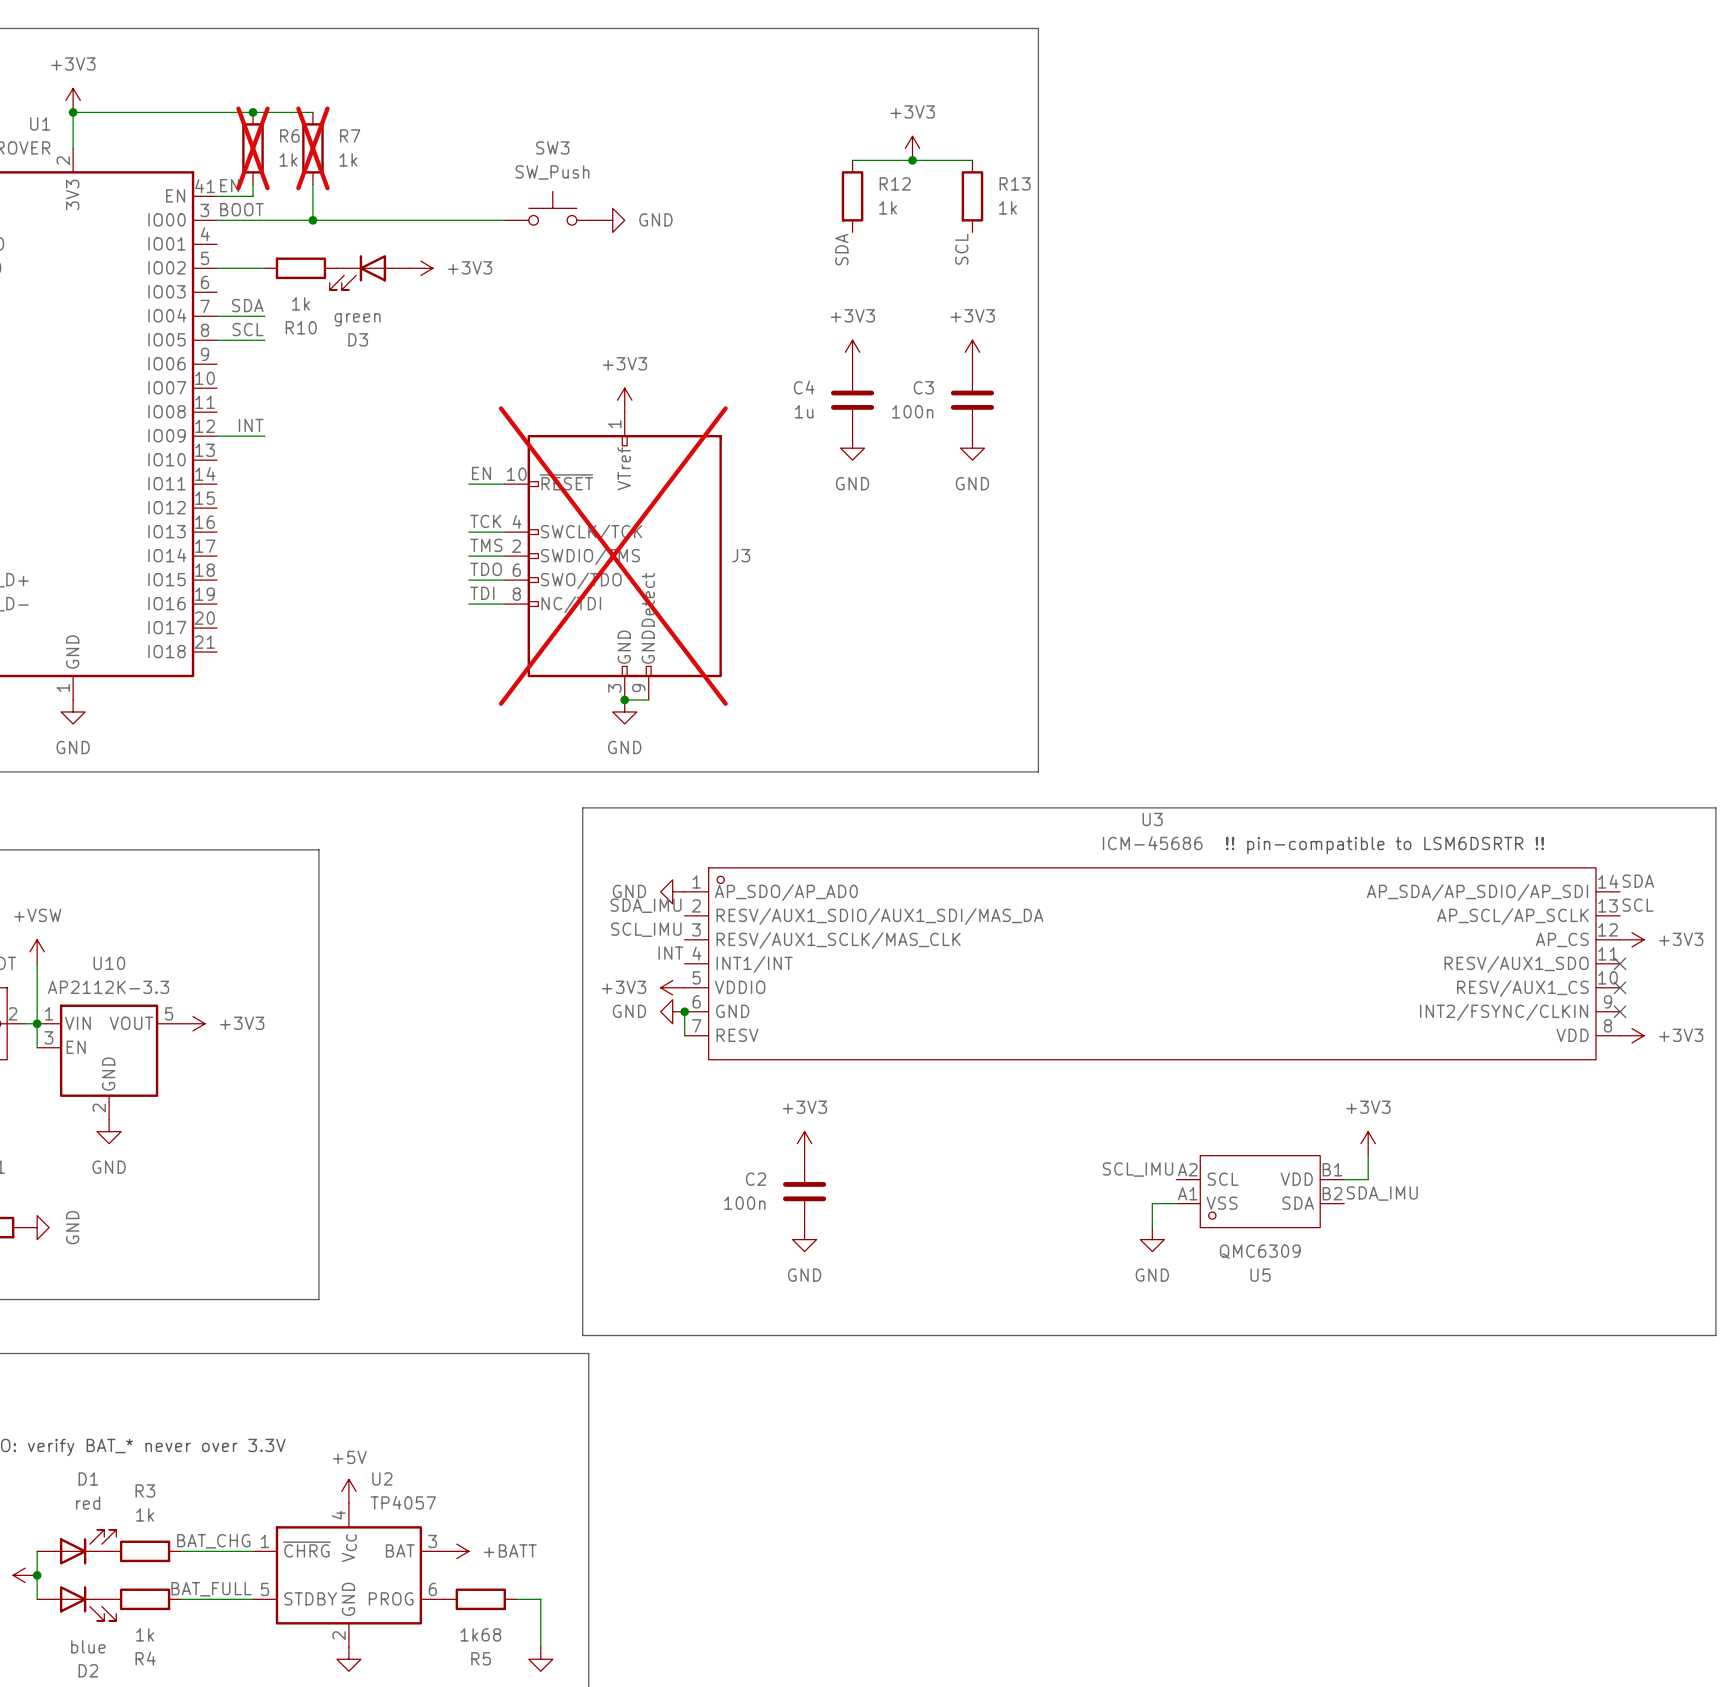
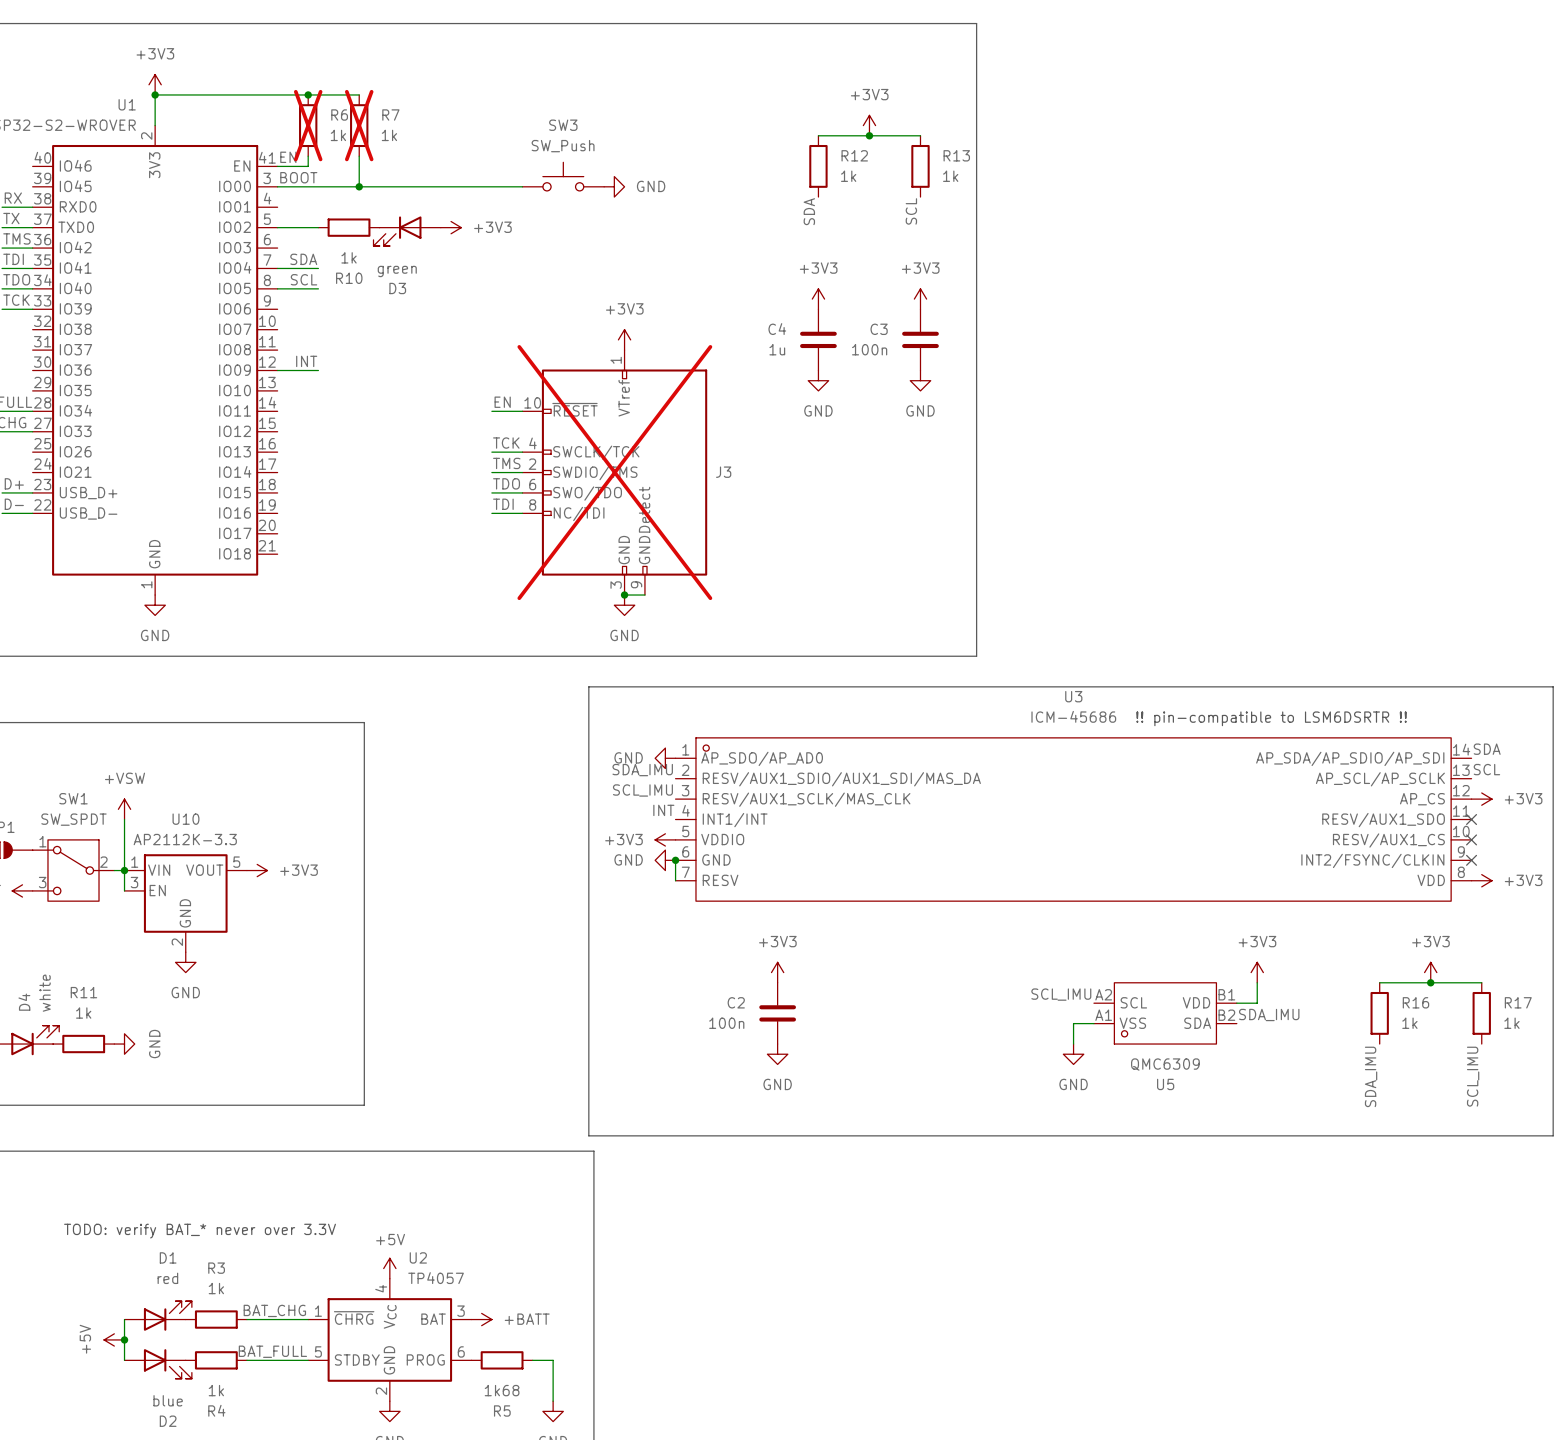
power symbol: none -> +3V3 (1430, 972)
wire: none -> (1379, 982) (1481, 982)
junction: none -> (1430, 982)
R16: none -> 1k (1379, 1013)
R17: none -> 1k (1481, 1013)
label: none -> SCL_IMU (1473, 1076)
label: none -> SDA_IMU (1371, 1076)

